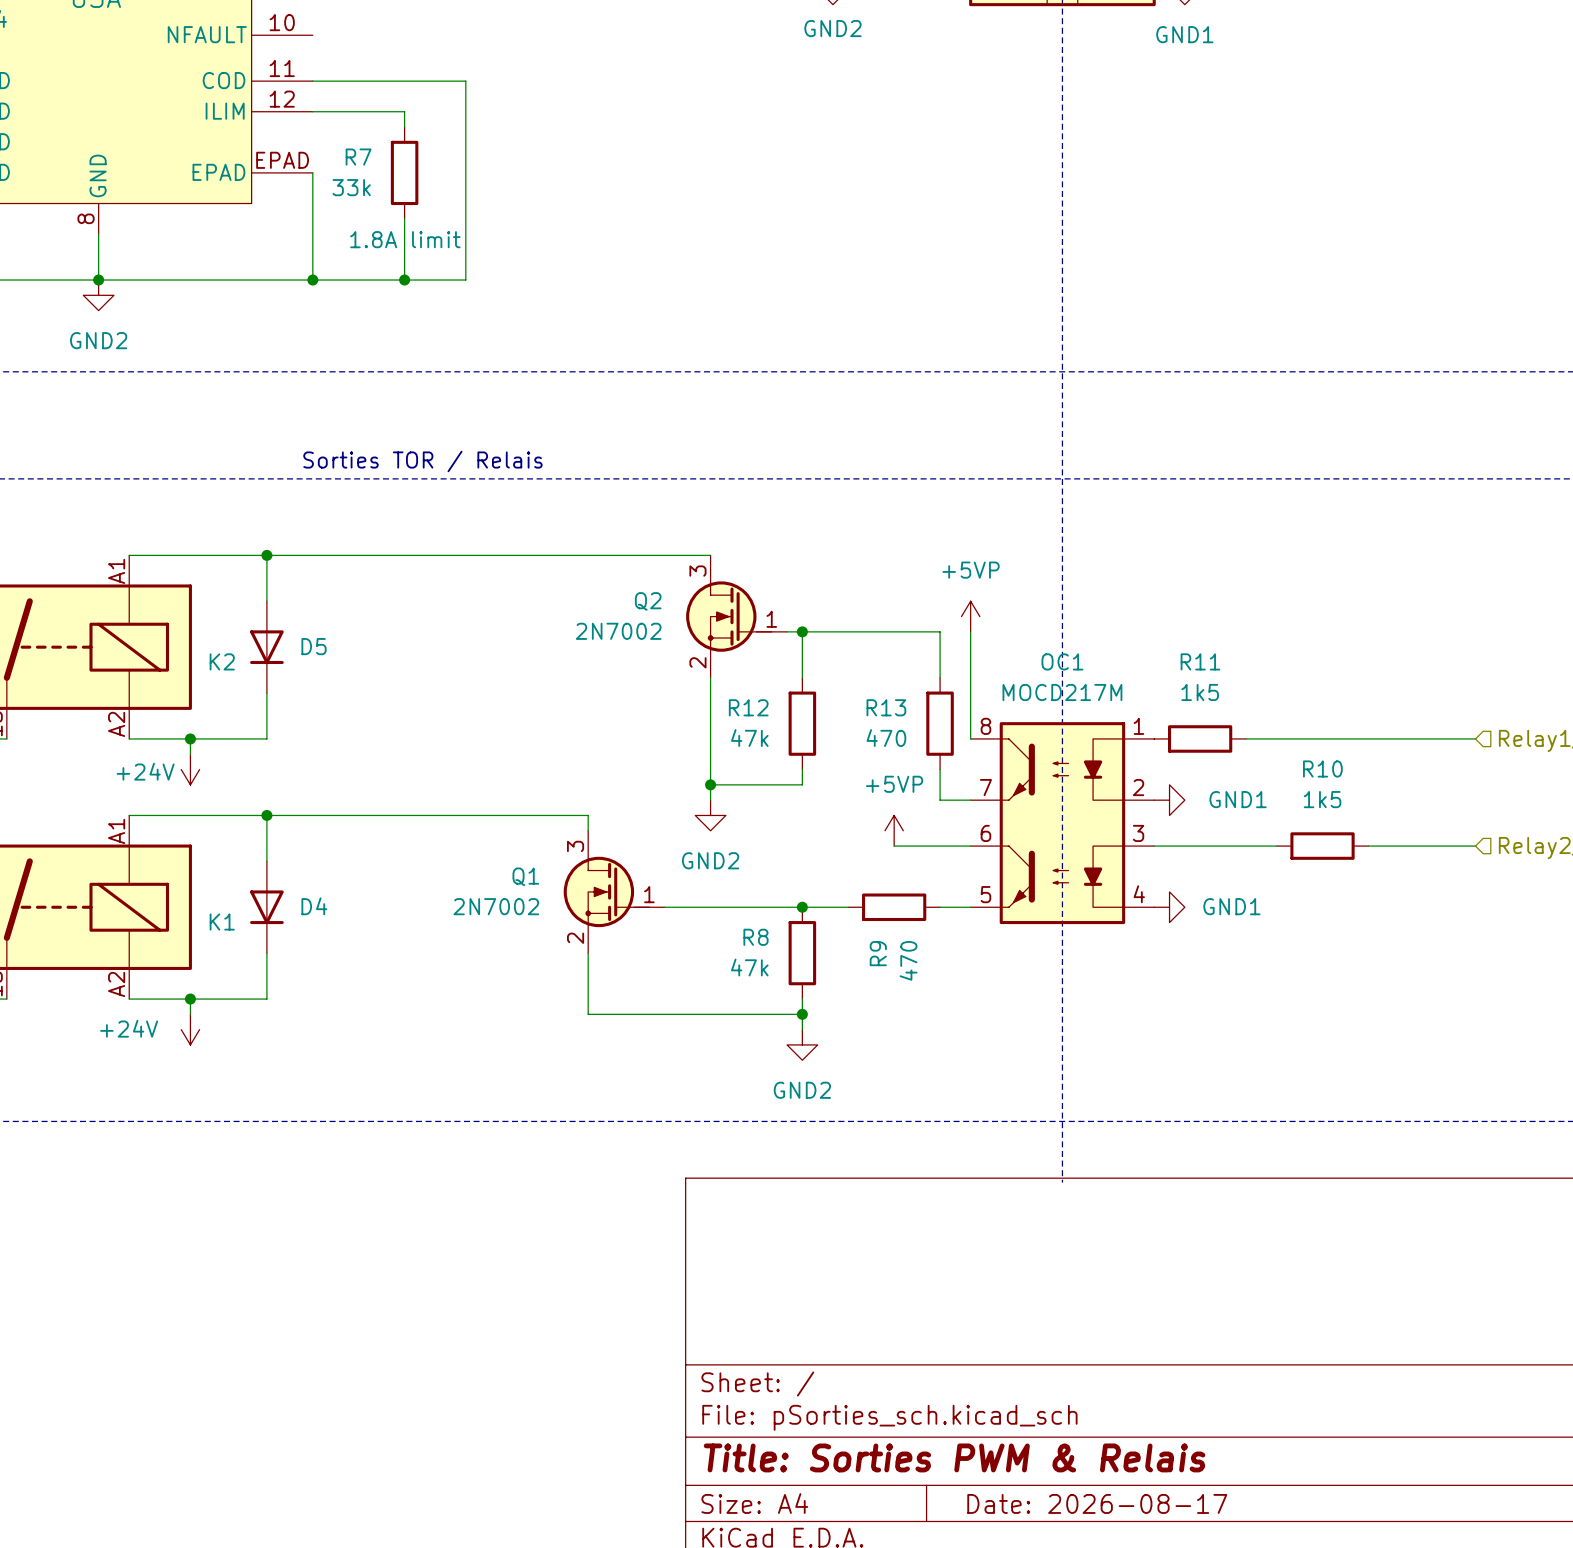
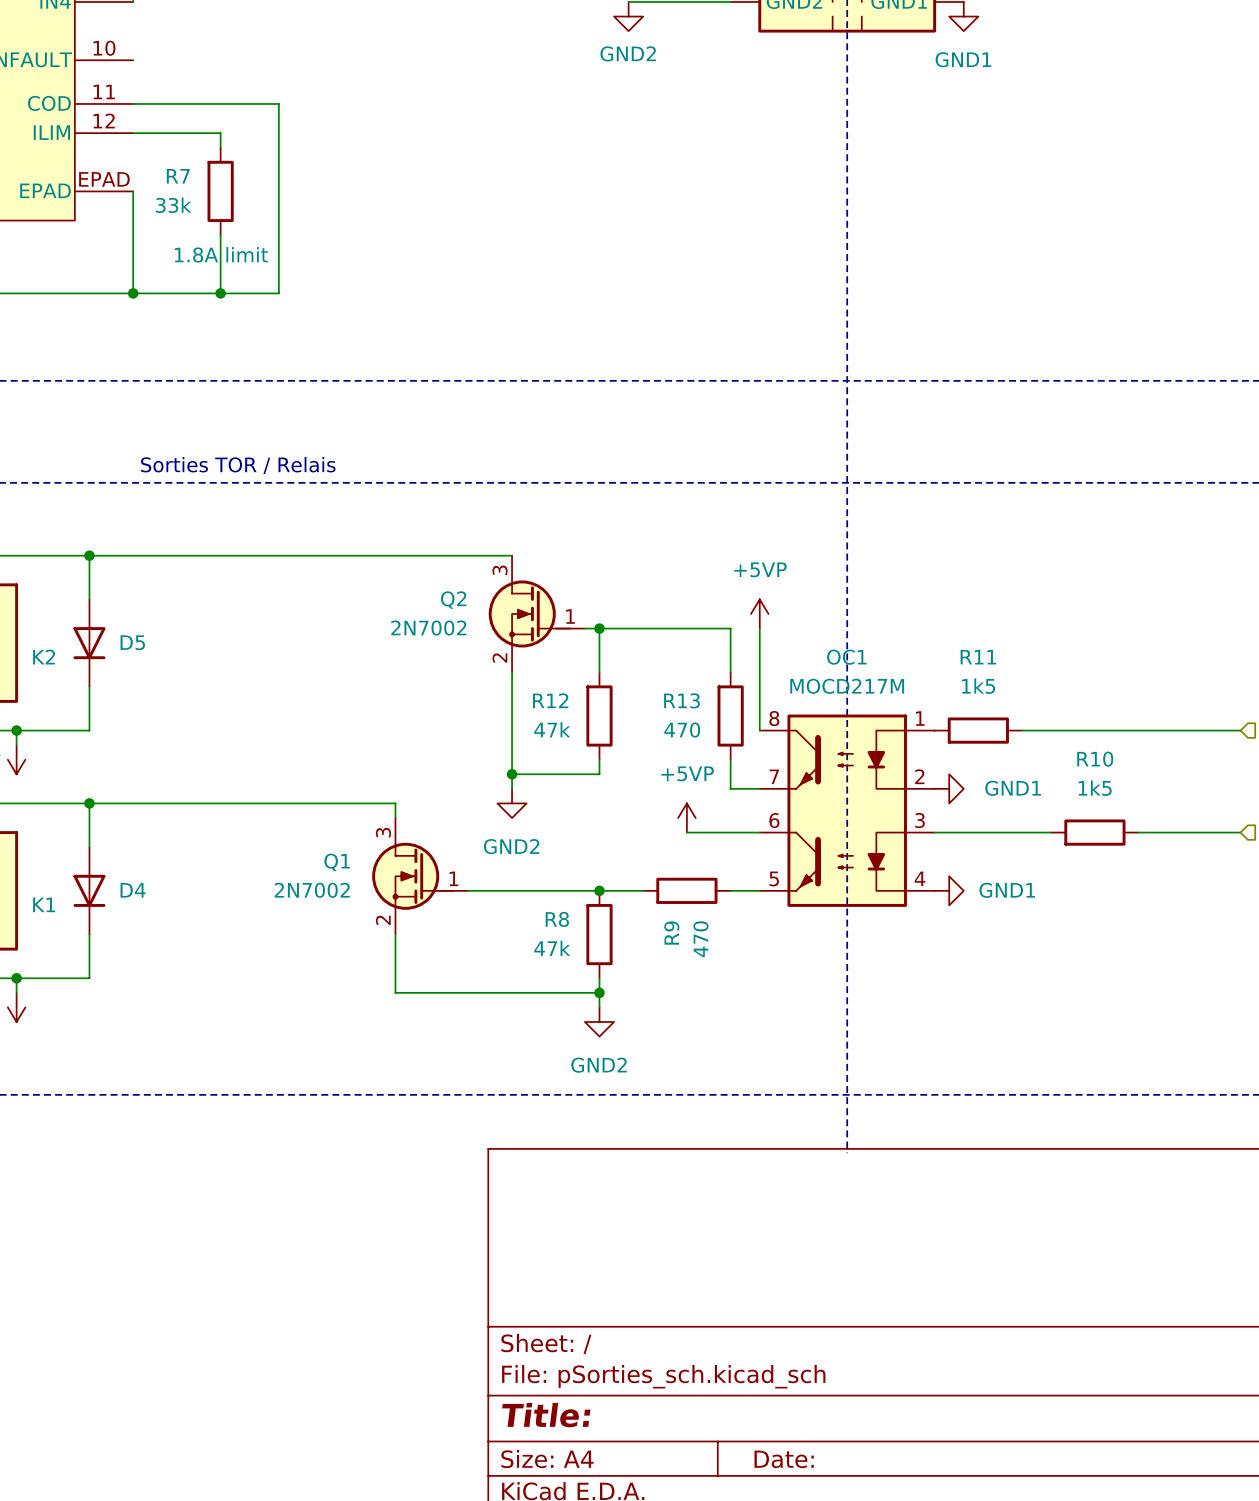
title block: Title: Sorties PWM & Relais (954, 1457) -> Title: (546, 1415)
title block: Date: 2026-08-17 (1097, 1503) -> Date: (784, 1459)

